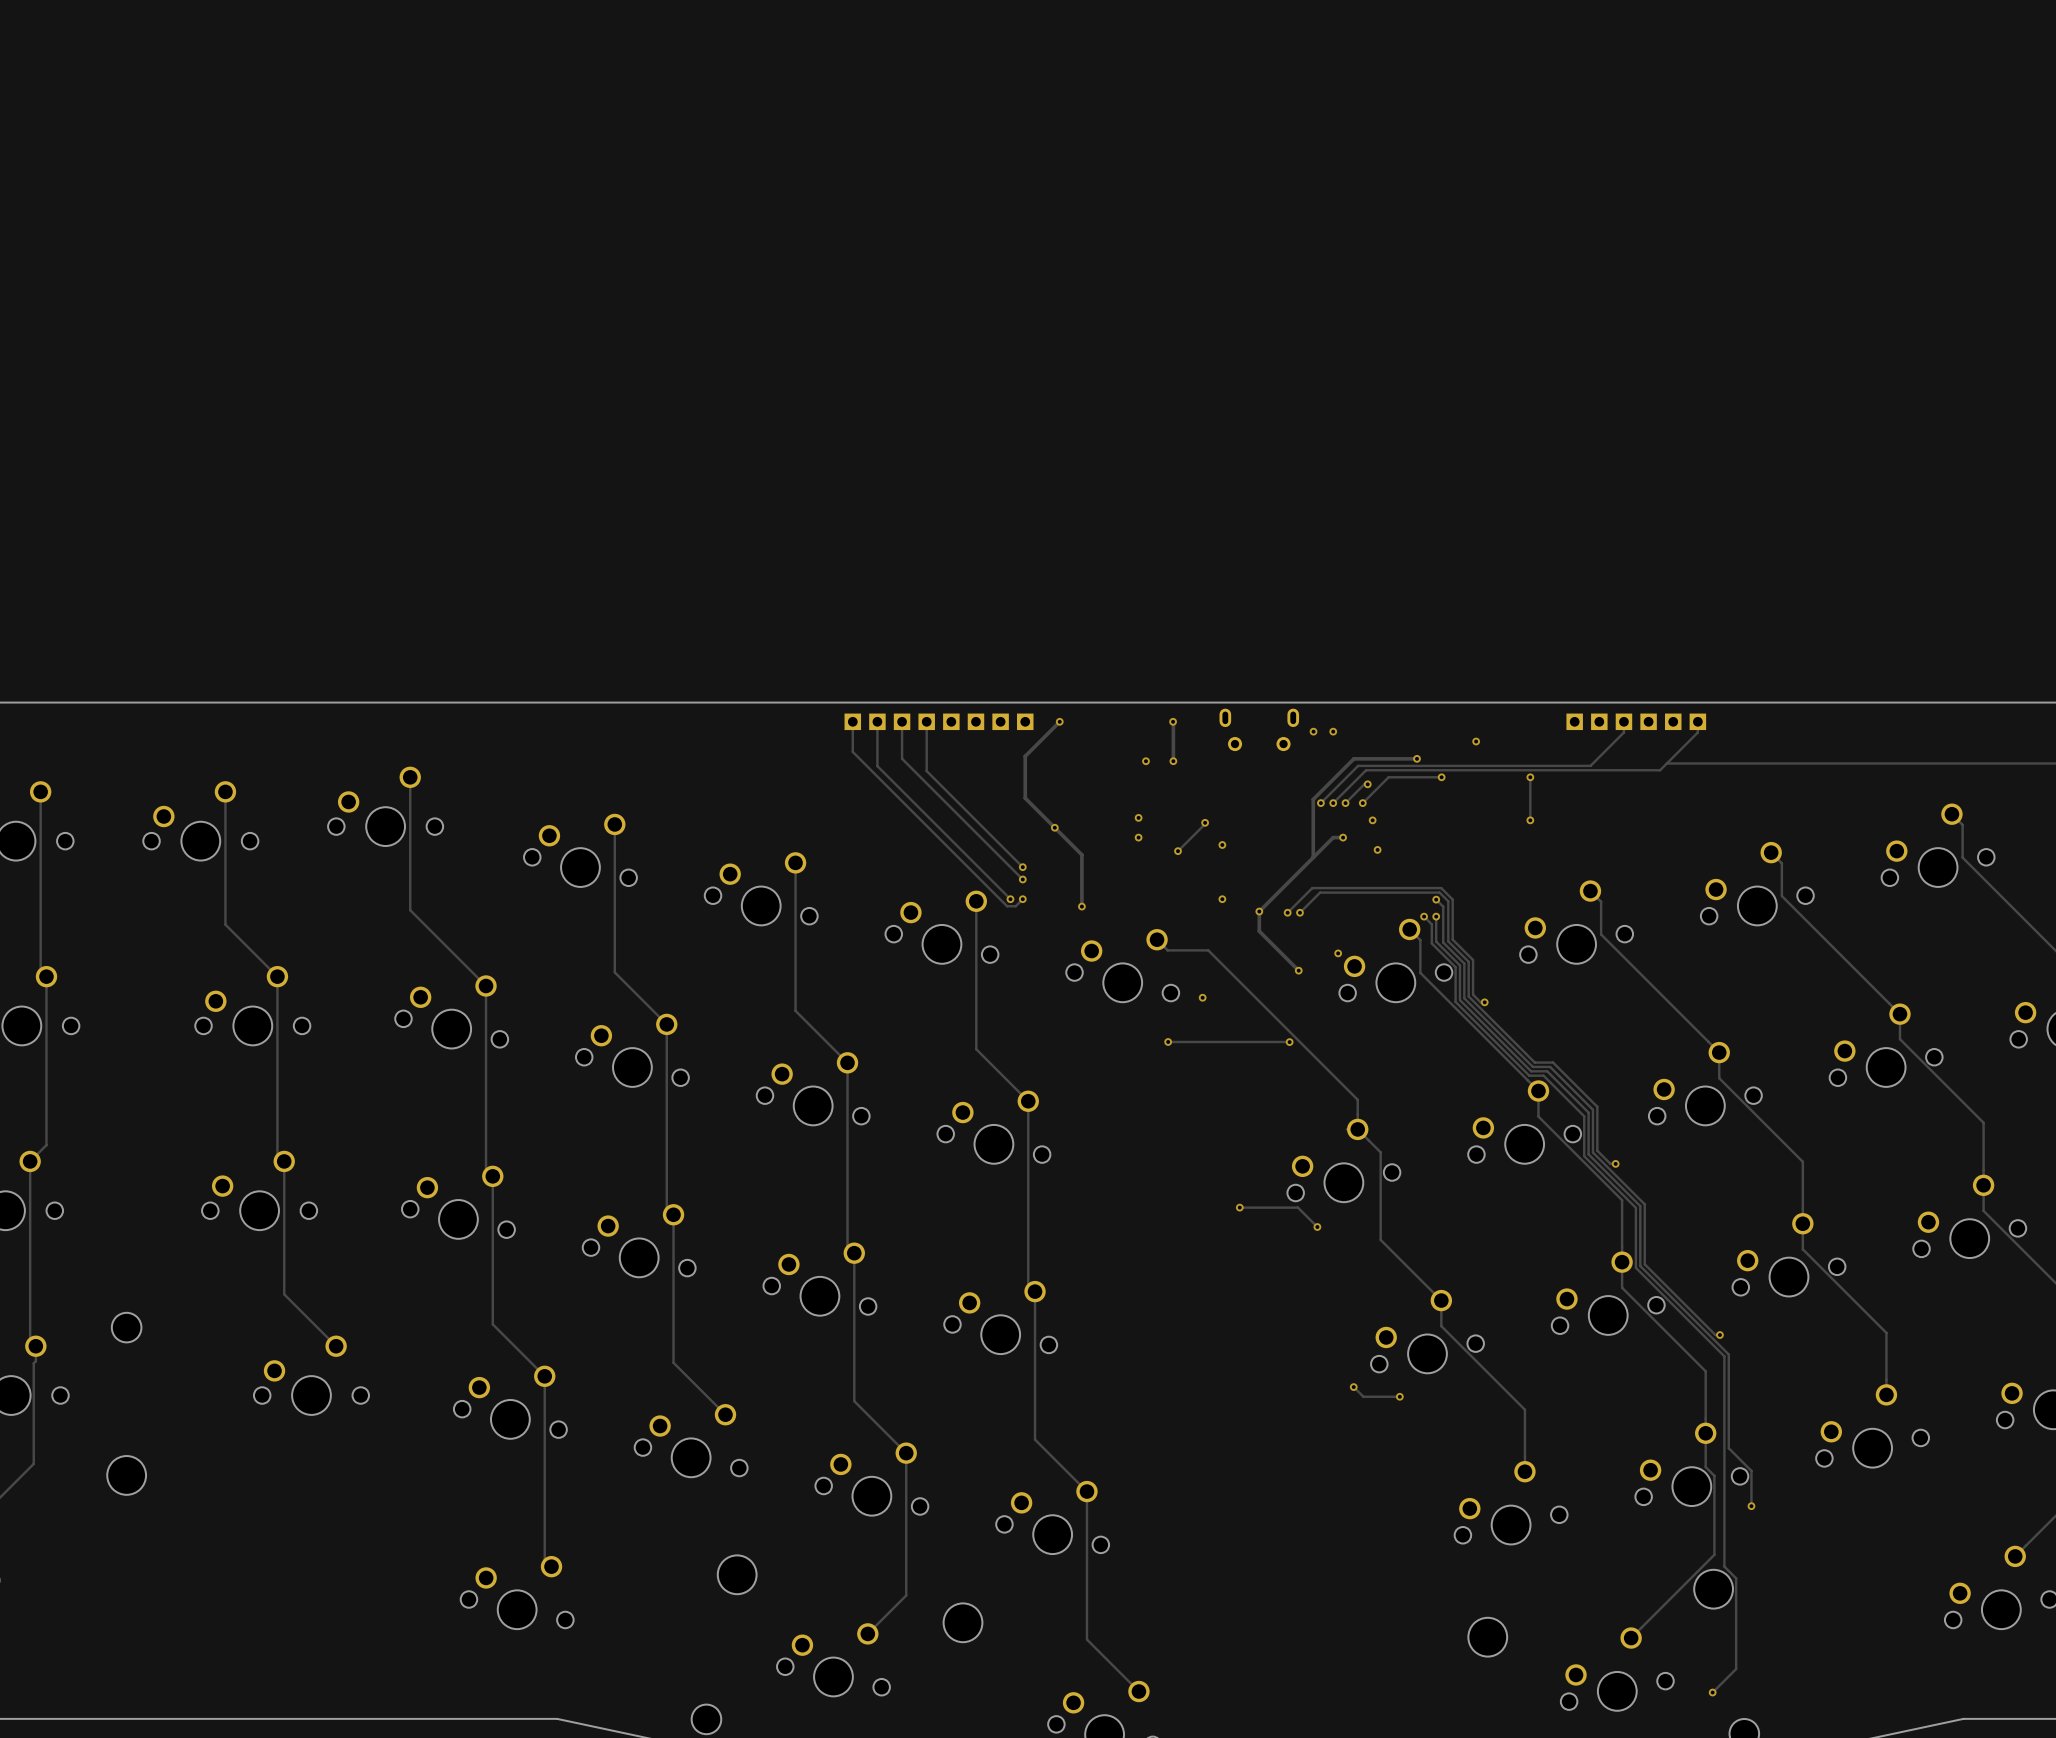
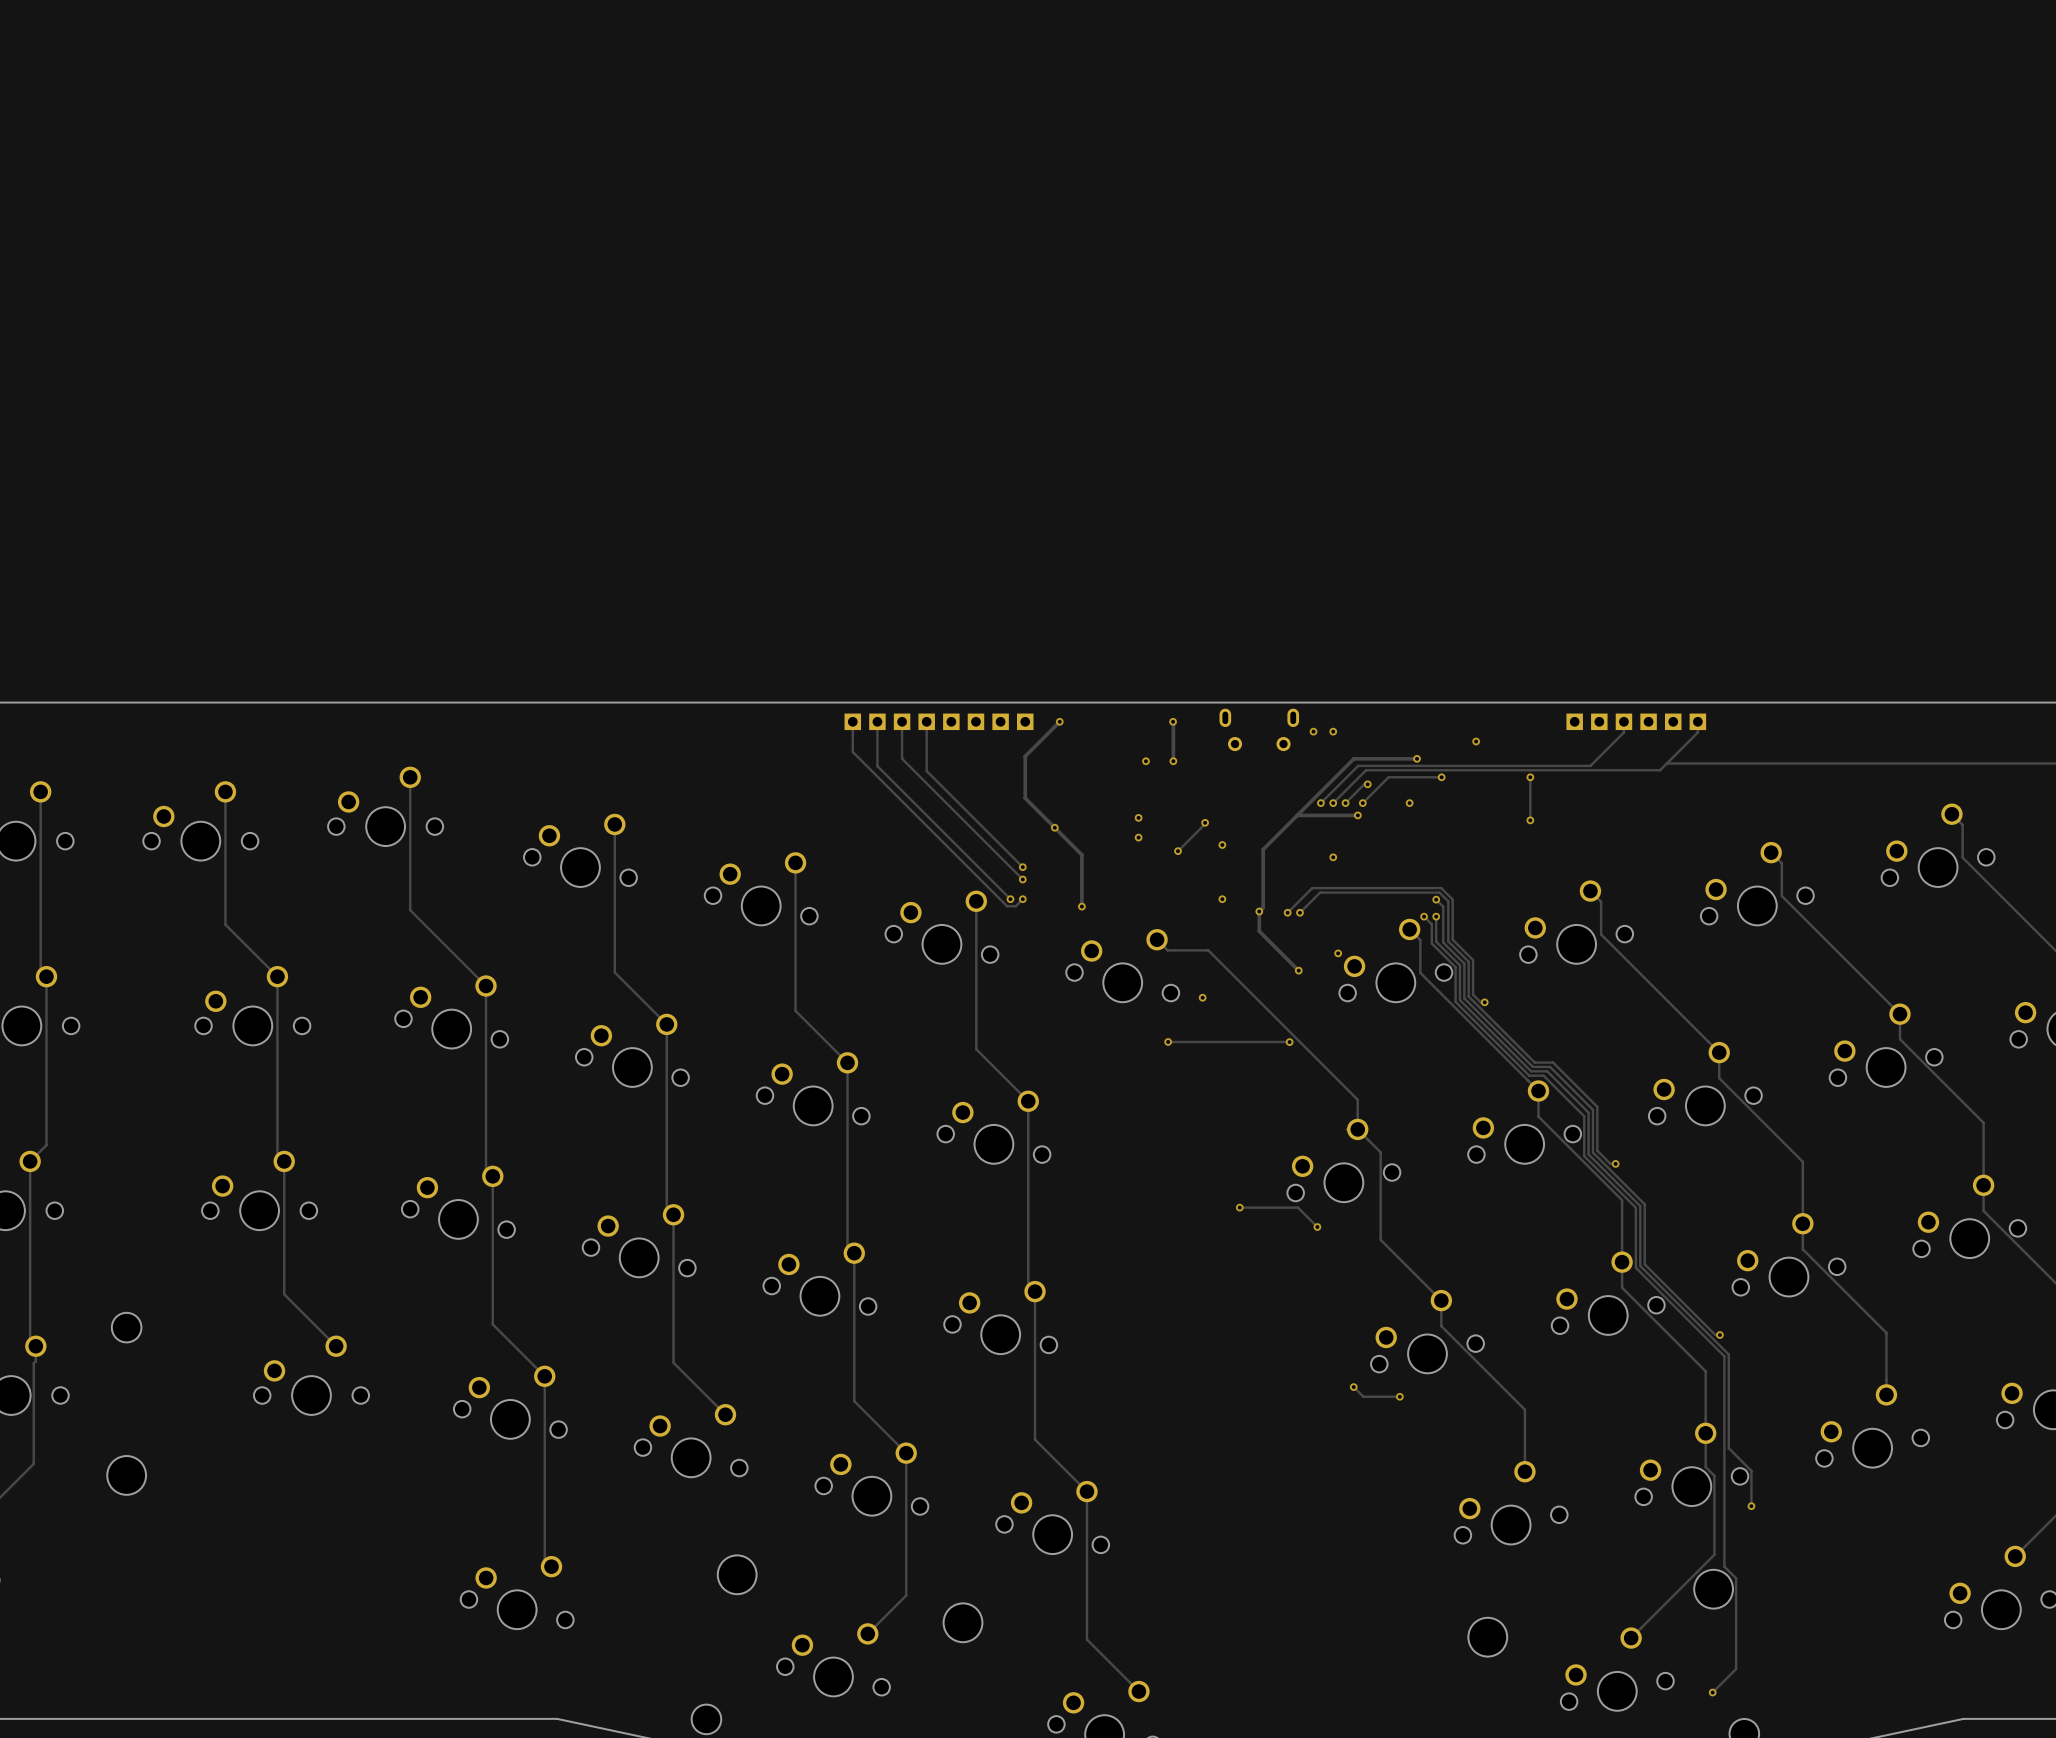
track: (1313, 799) (1313, 857) -> none
via: none -> (1409, 803)
track: none -> (1297, 815) (1357, 815)
via: none -> (1357, 815)
via: (1372, 820) -> none
track: (1343, 837) (1333, 837) (1263, 907) -> (1313, 799) (1263, 849) (1263, 907)
via: (1343, 837) -> none
via: (1377, 849) -> none
via: none -> (1333, 857)

